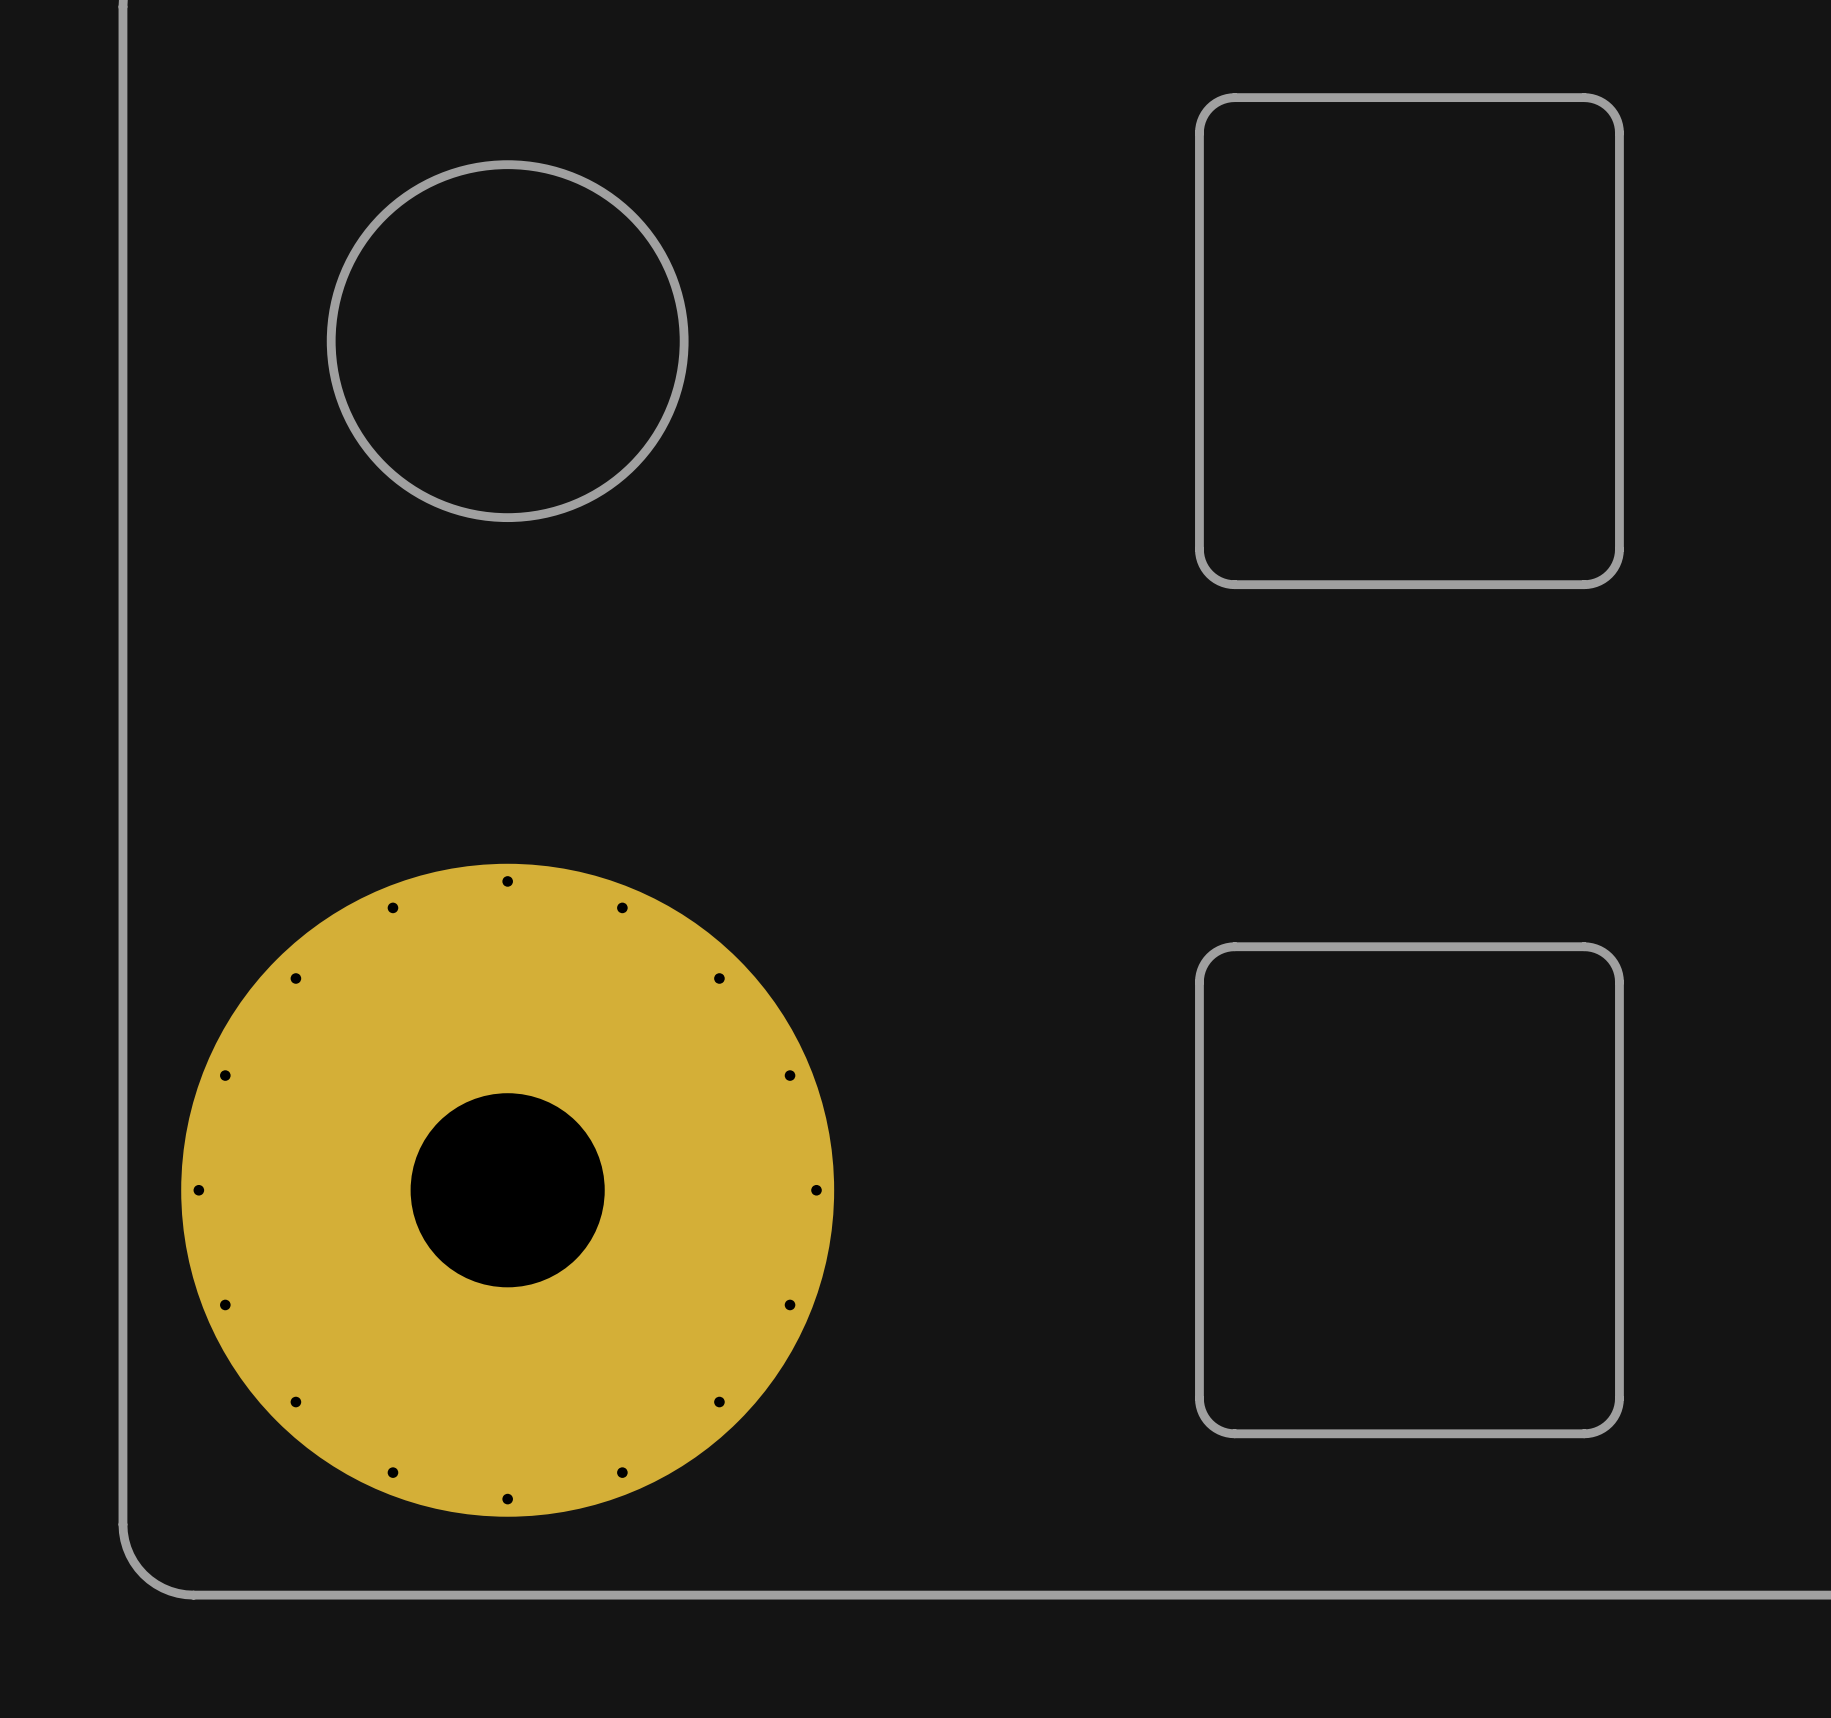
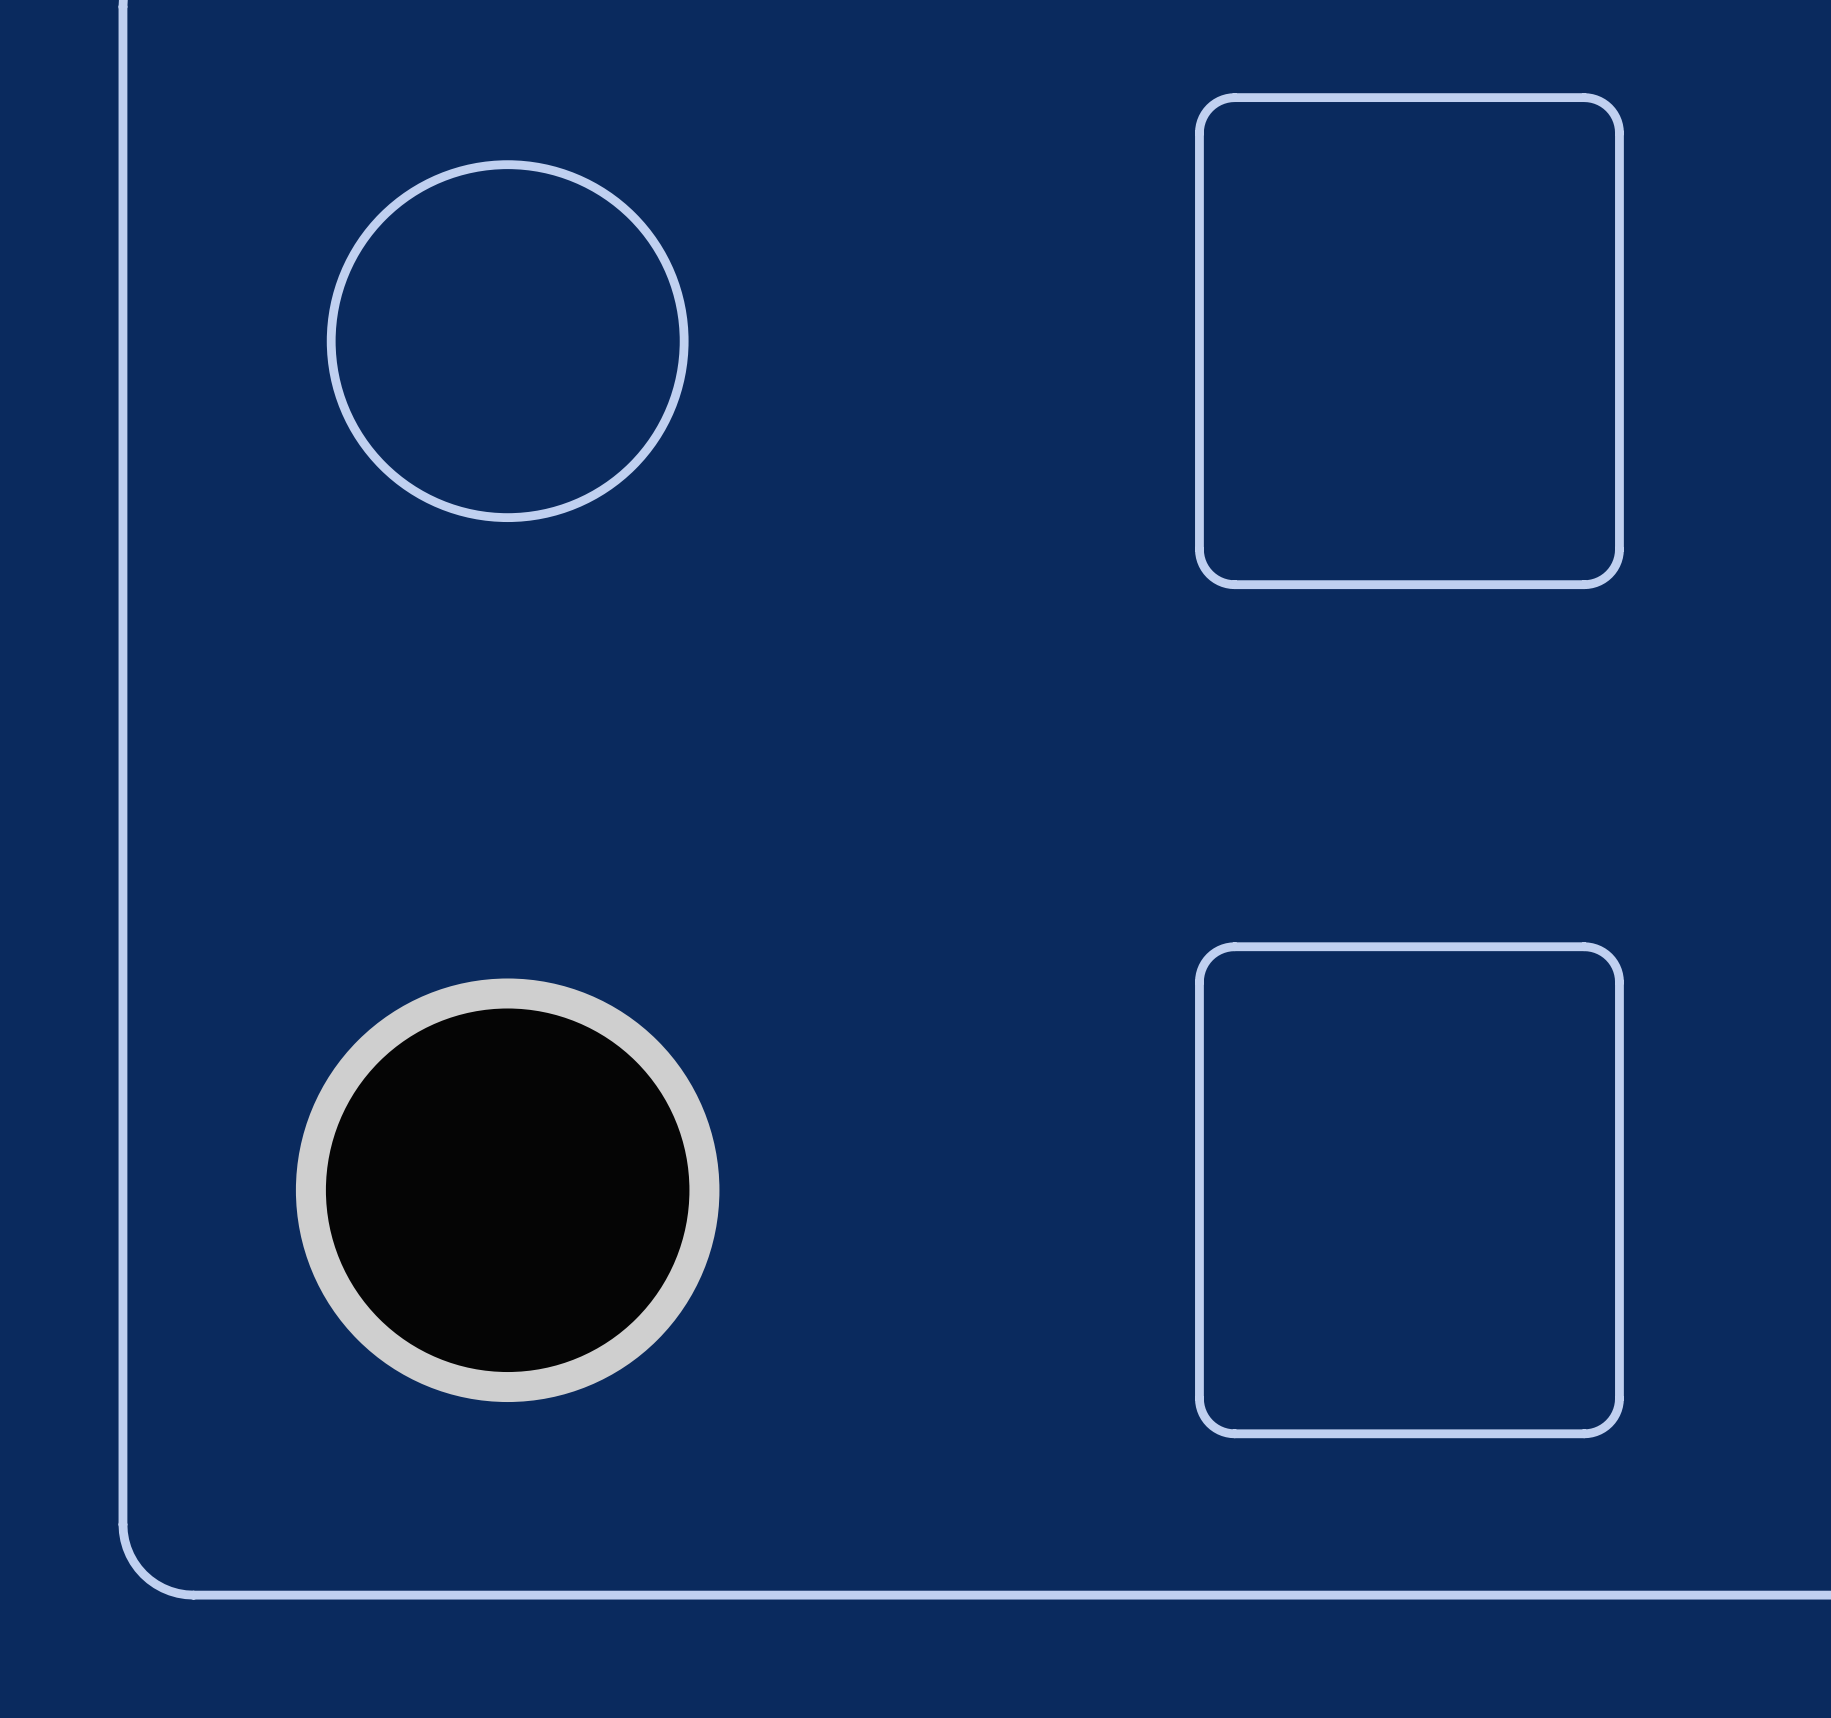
part footprint: [181, 863, 835, 1517] -> [295, 978, 720, 1403]

